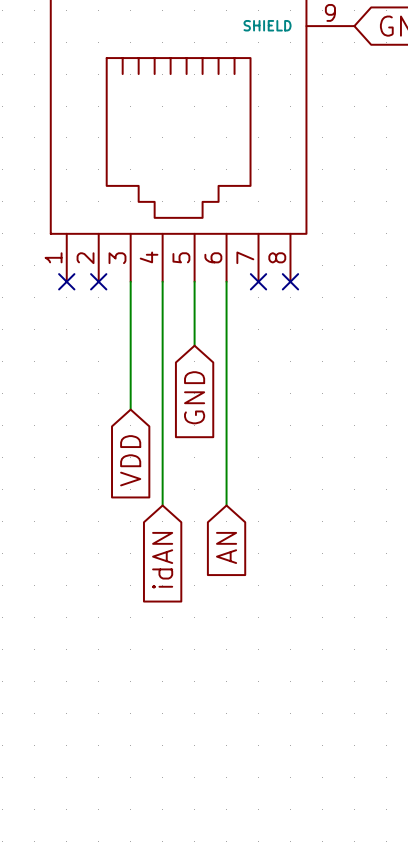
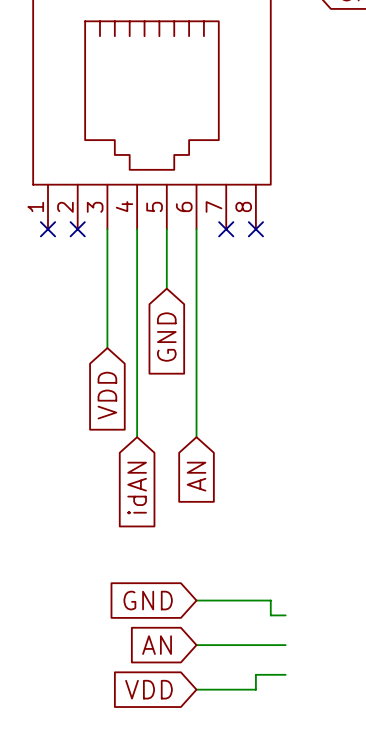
global label: none -> GND (148, 600)
wire: none -> (196, 600) (270, 600) (270, 615) (285, 615)
global label: none -> AN (157, 645)
wire: none -> (196, 645) (285, 645)
wire: none -> (285, 674) (255, 674) (255, 689) (196, 689)
global label: none -> VDD (148, 689)

